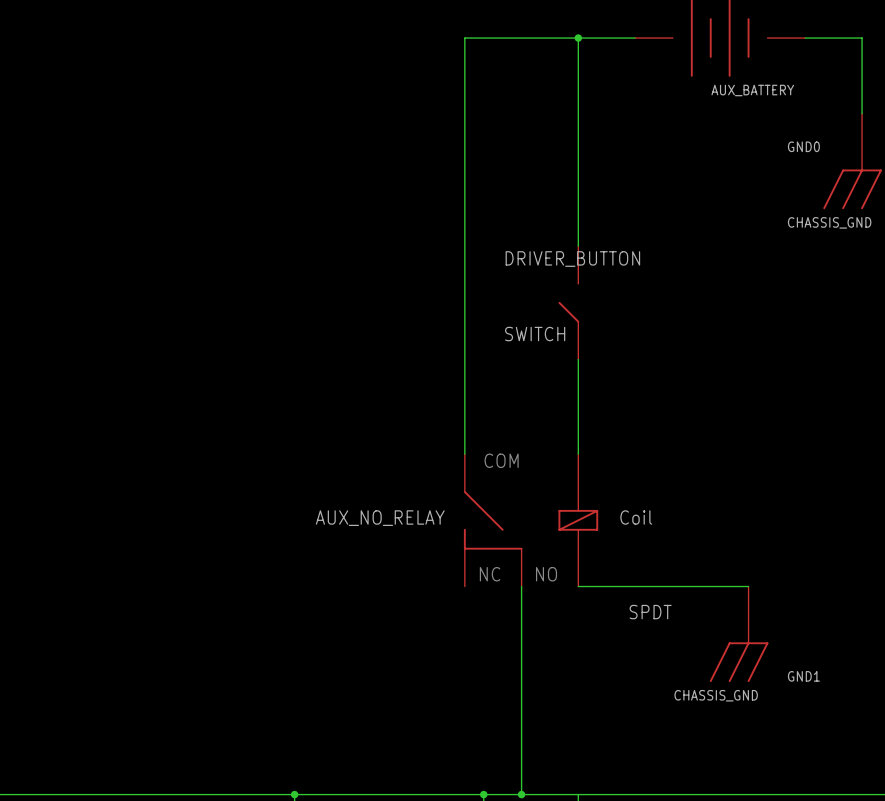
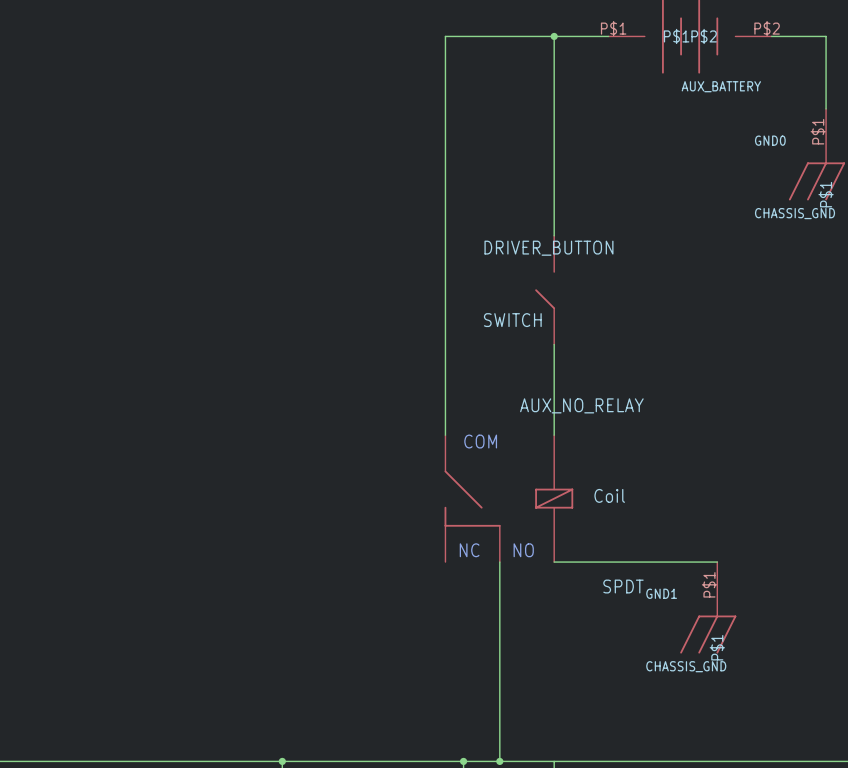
part pin number: none -> P$1 (613, 28)
part pin number: none -> P$2 (767, 28)
part pin name: none -> P$1 (676, 36)
part pin name: none -> P$2 (704, 36)
GND0 pin number: none -> P$1 (818, 131)
GND0 pin name: none -> P$1 (826, 194)
AUX_NO_RELAY name position: AUX_NO_RELAY (380, 518) -> AUX_NO_RELAY (581, 405)
GND1 pin number: none -> P$1 (709, 584)
GND1 pin name: none -> P$1 (717, 647)
GND1 name position: GND1 (803, 676) -> GND1 (661, 593)

